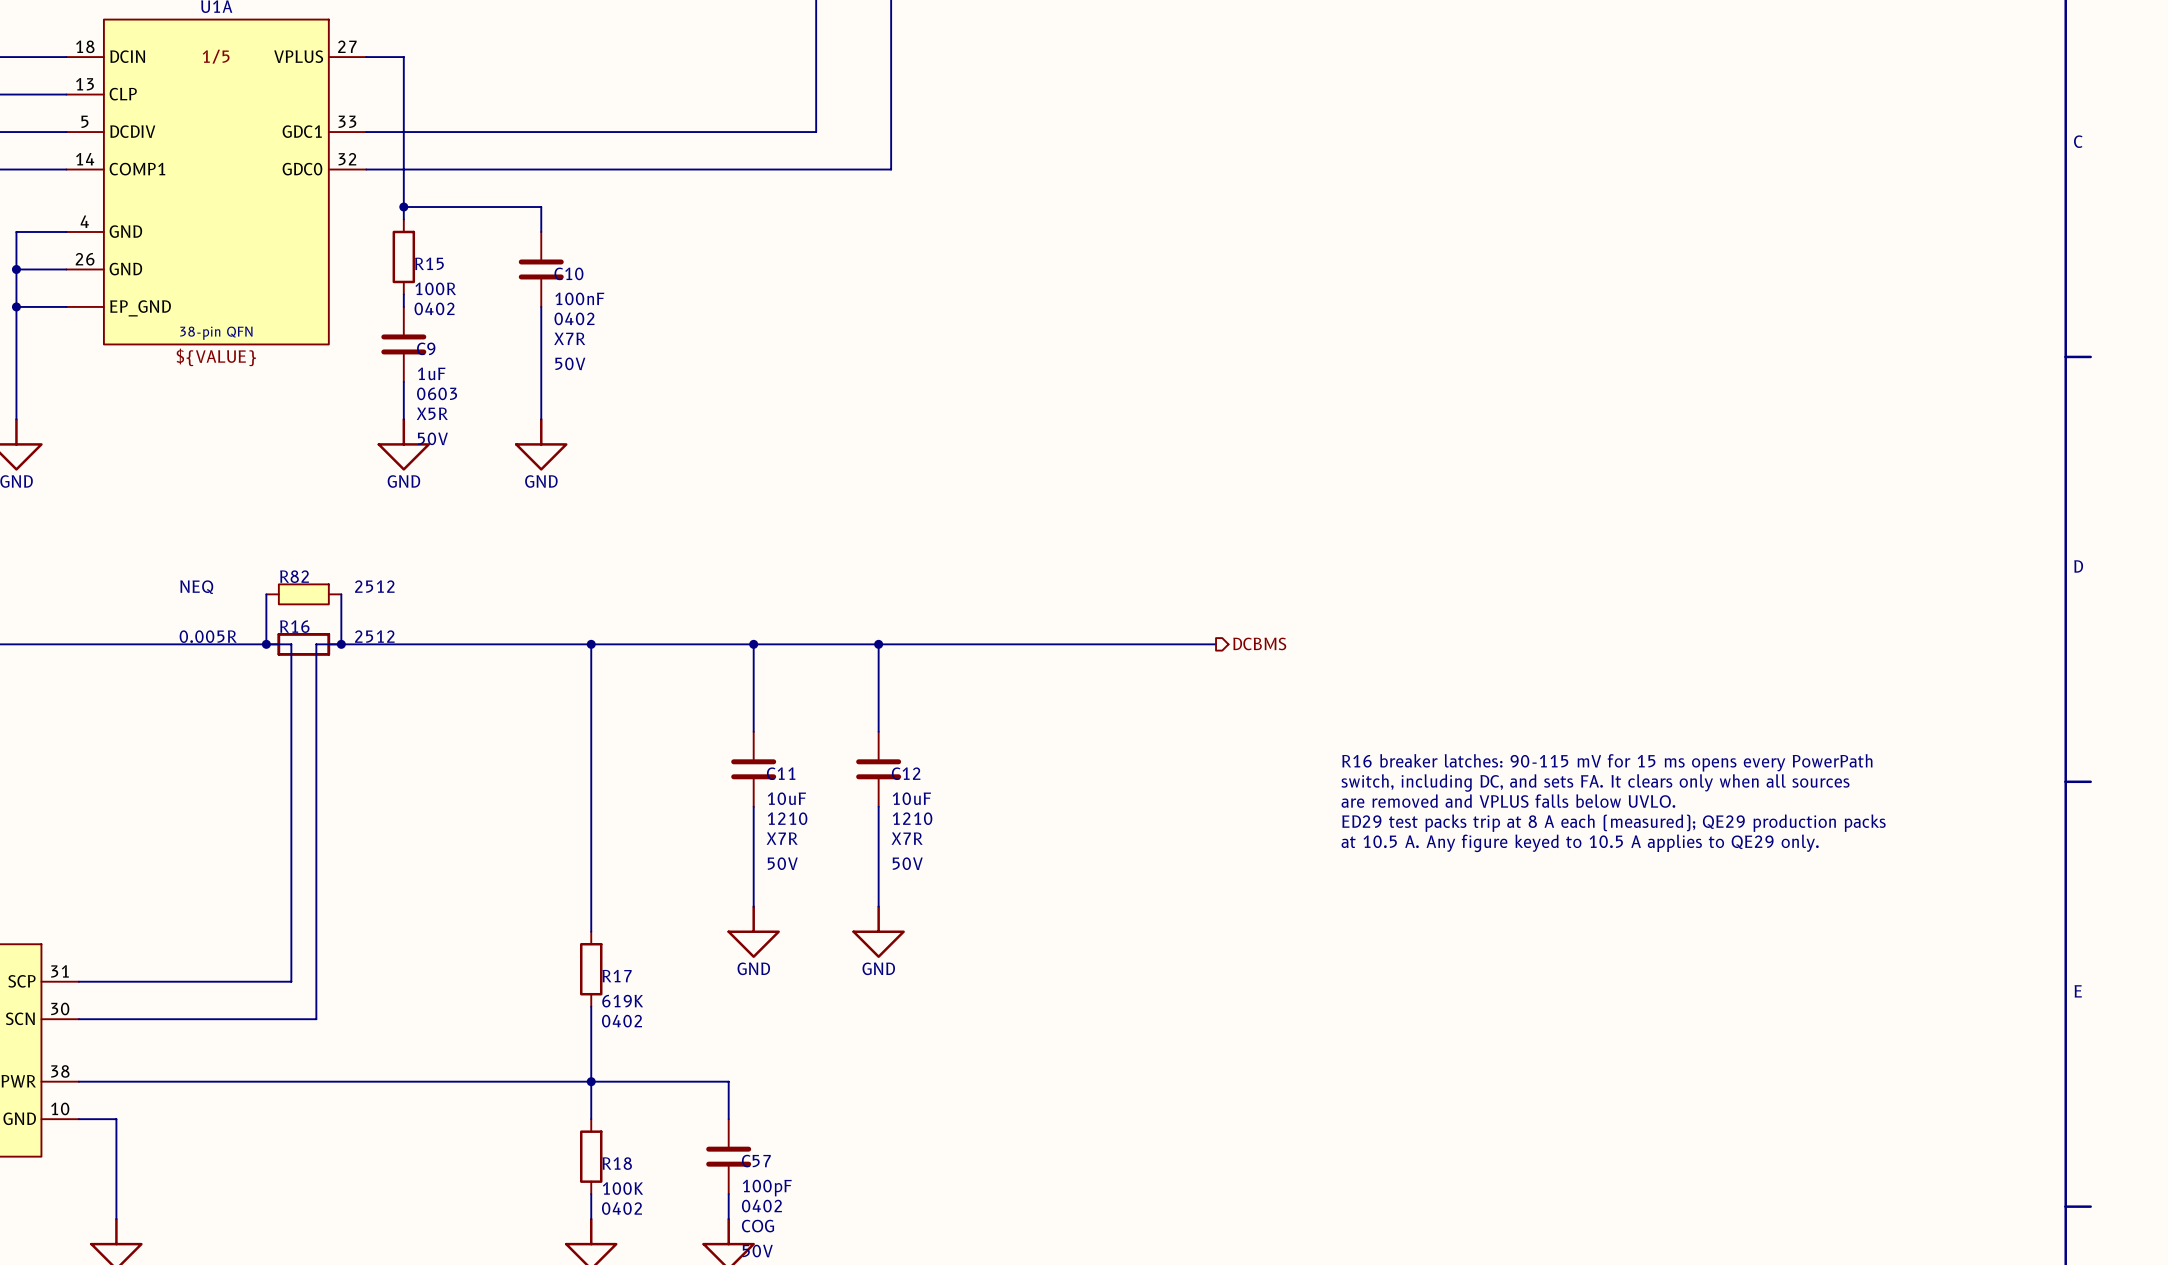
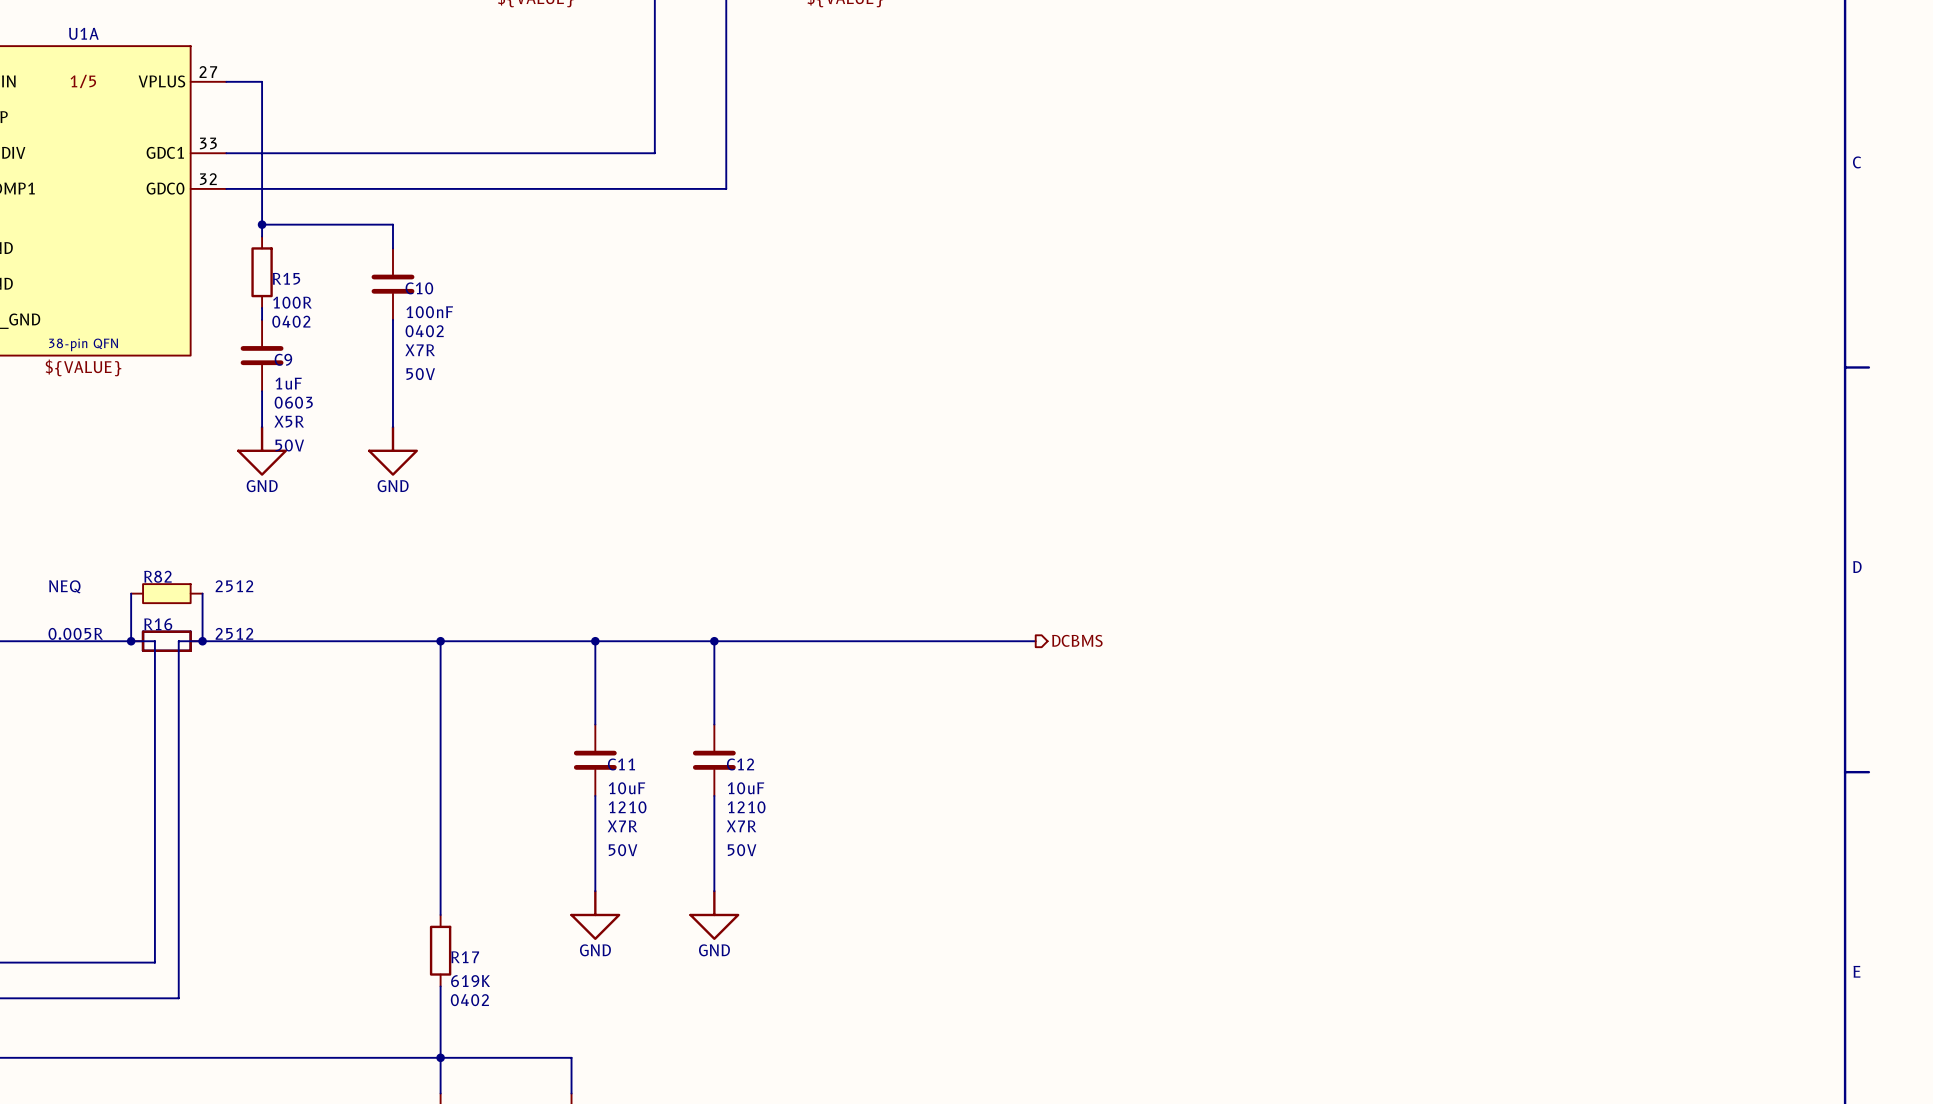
text: R16 breaker latches: 90-115 mV for 15 ms opens every PowerPath (1607, 762) -> none
text: switch, including DC, and sets FA. It clears only when all sources (1595, 783) -> none
text: are removed and VPLUS falls below UVLO. (1508, 801) -> none
text: ED29 test packs trip at 8 A each (measured); QE29 production packs (1613, 823) -> none
text: at 10.5 A. Any figure keyed to 10.5 A applies to QE29 only. (1580, 843) -> none

